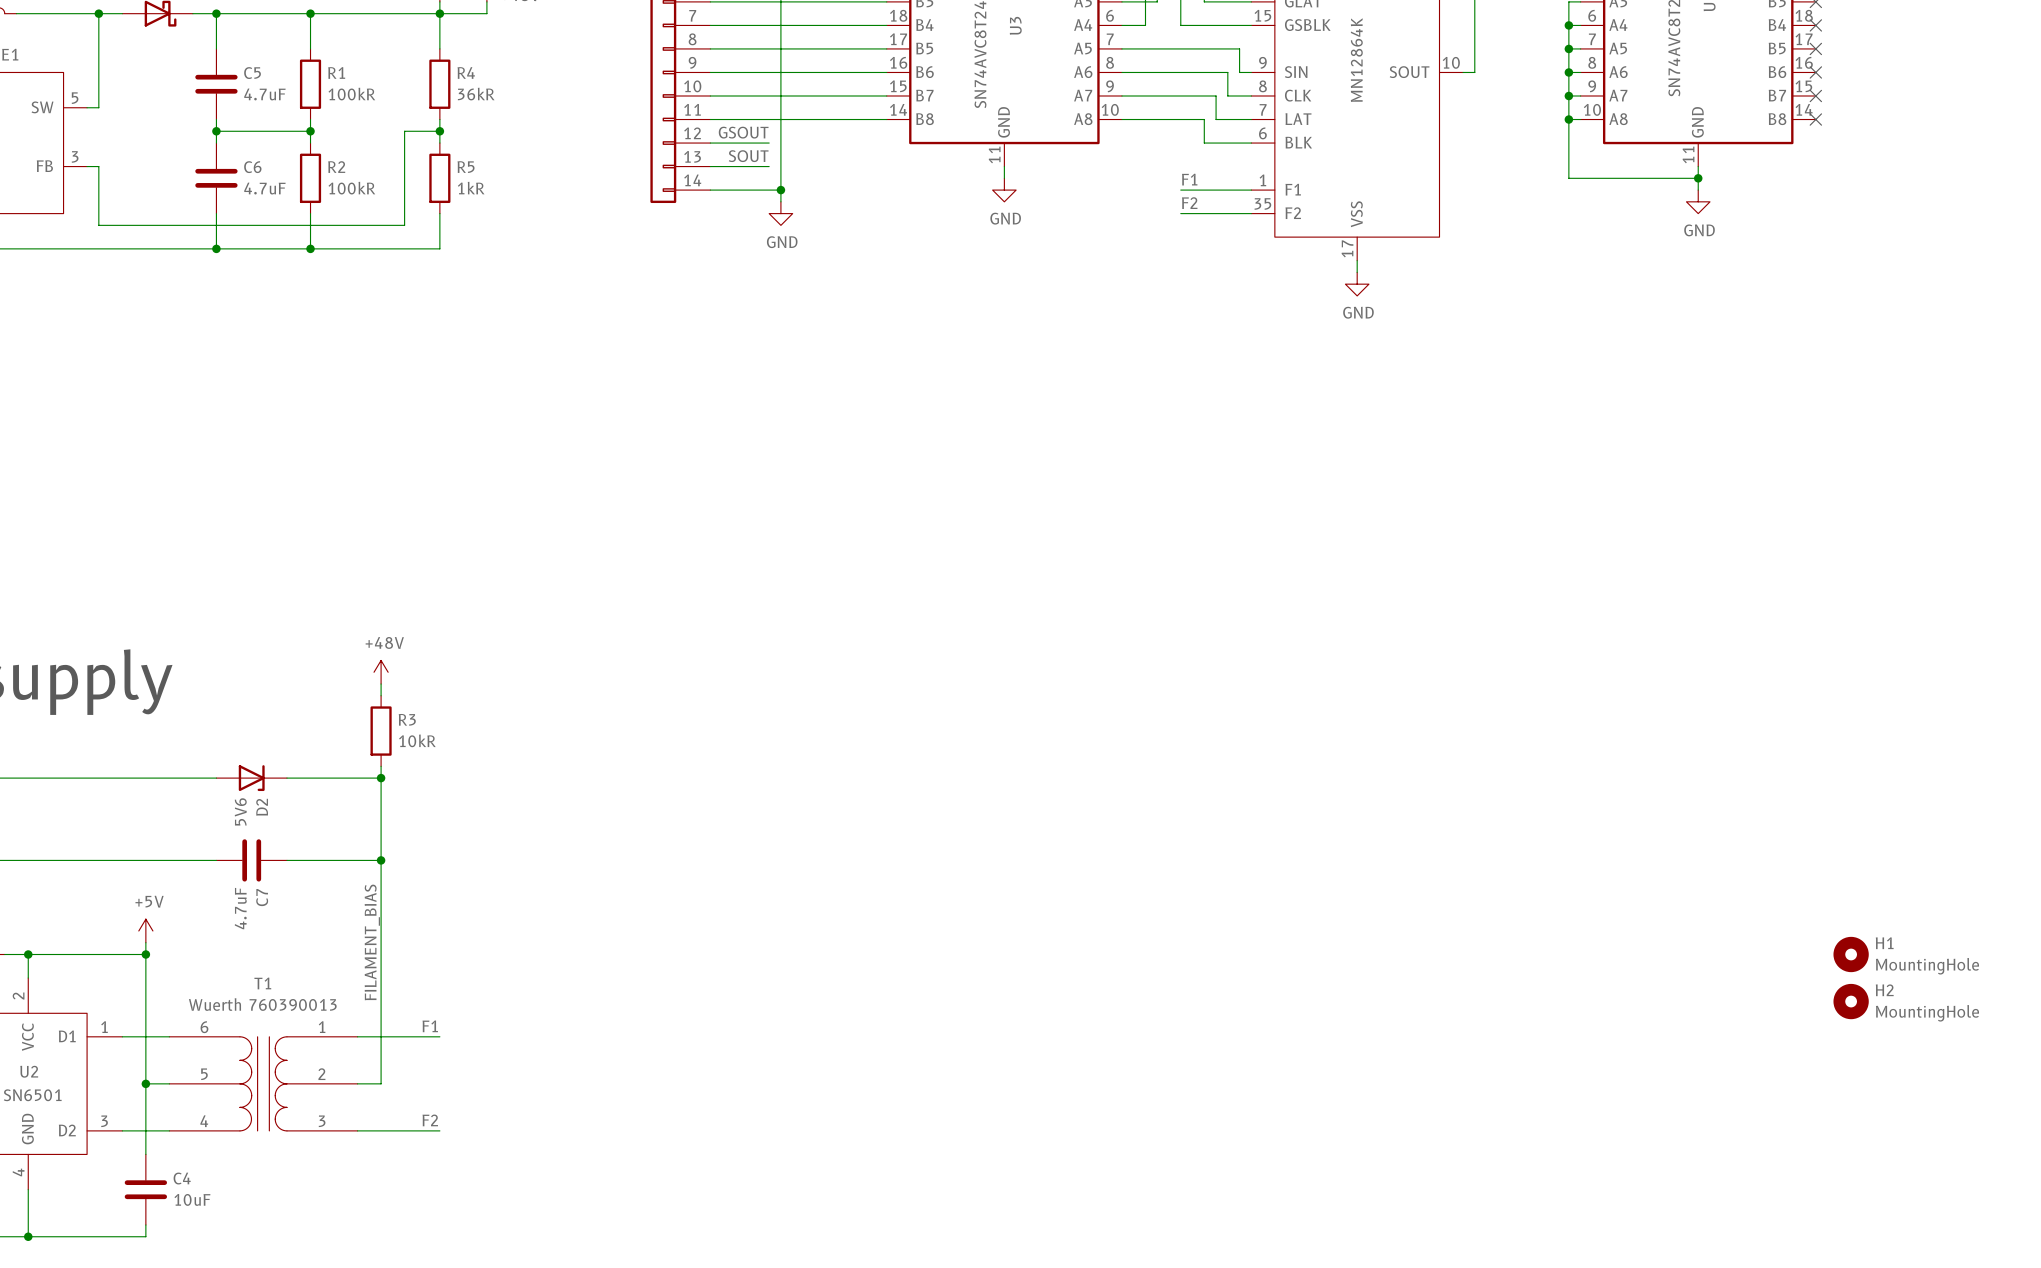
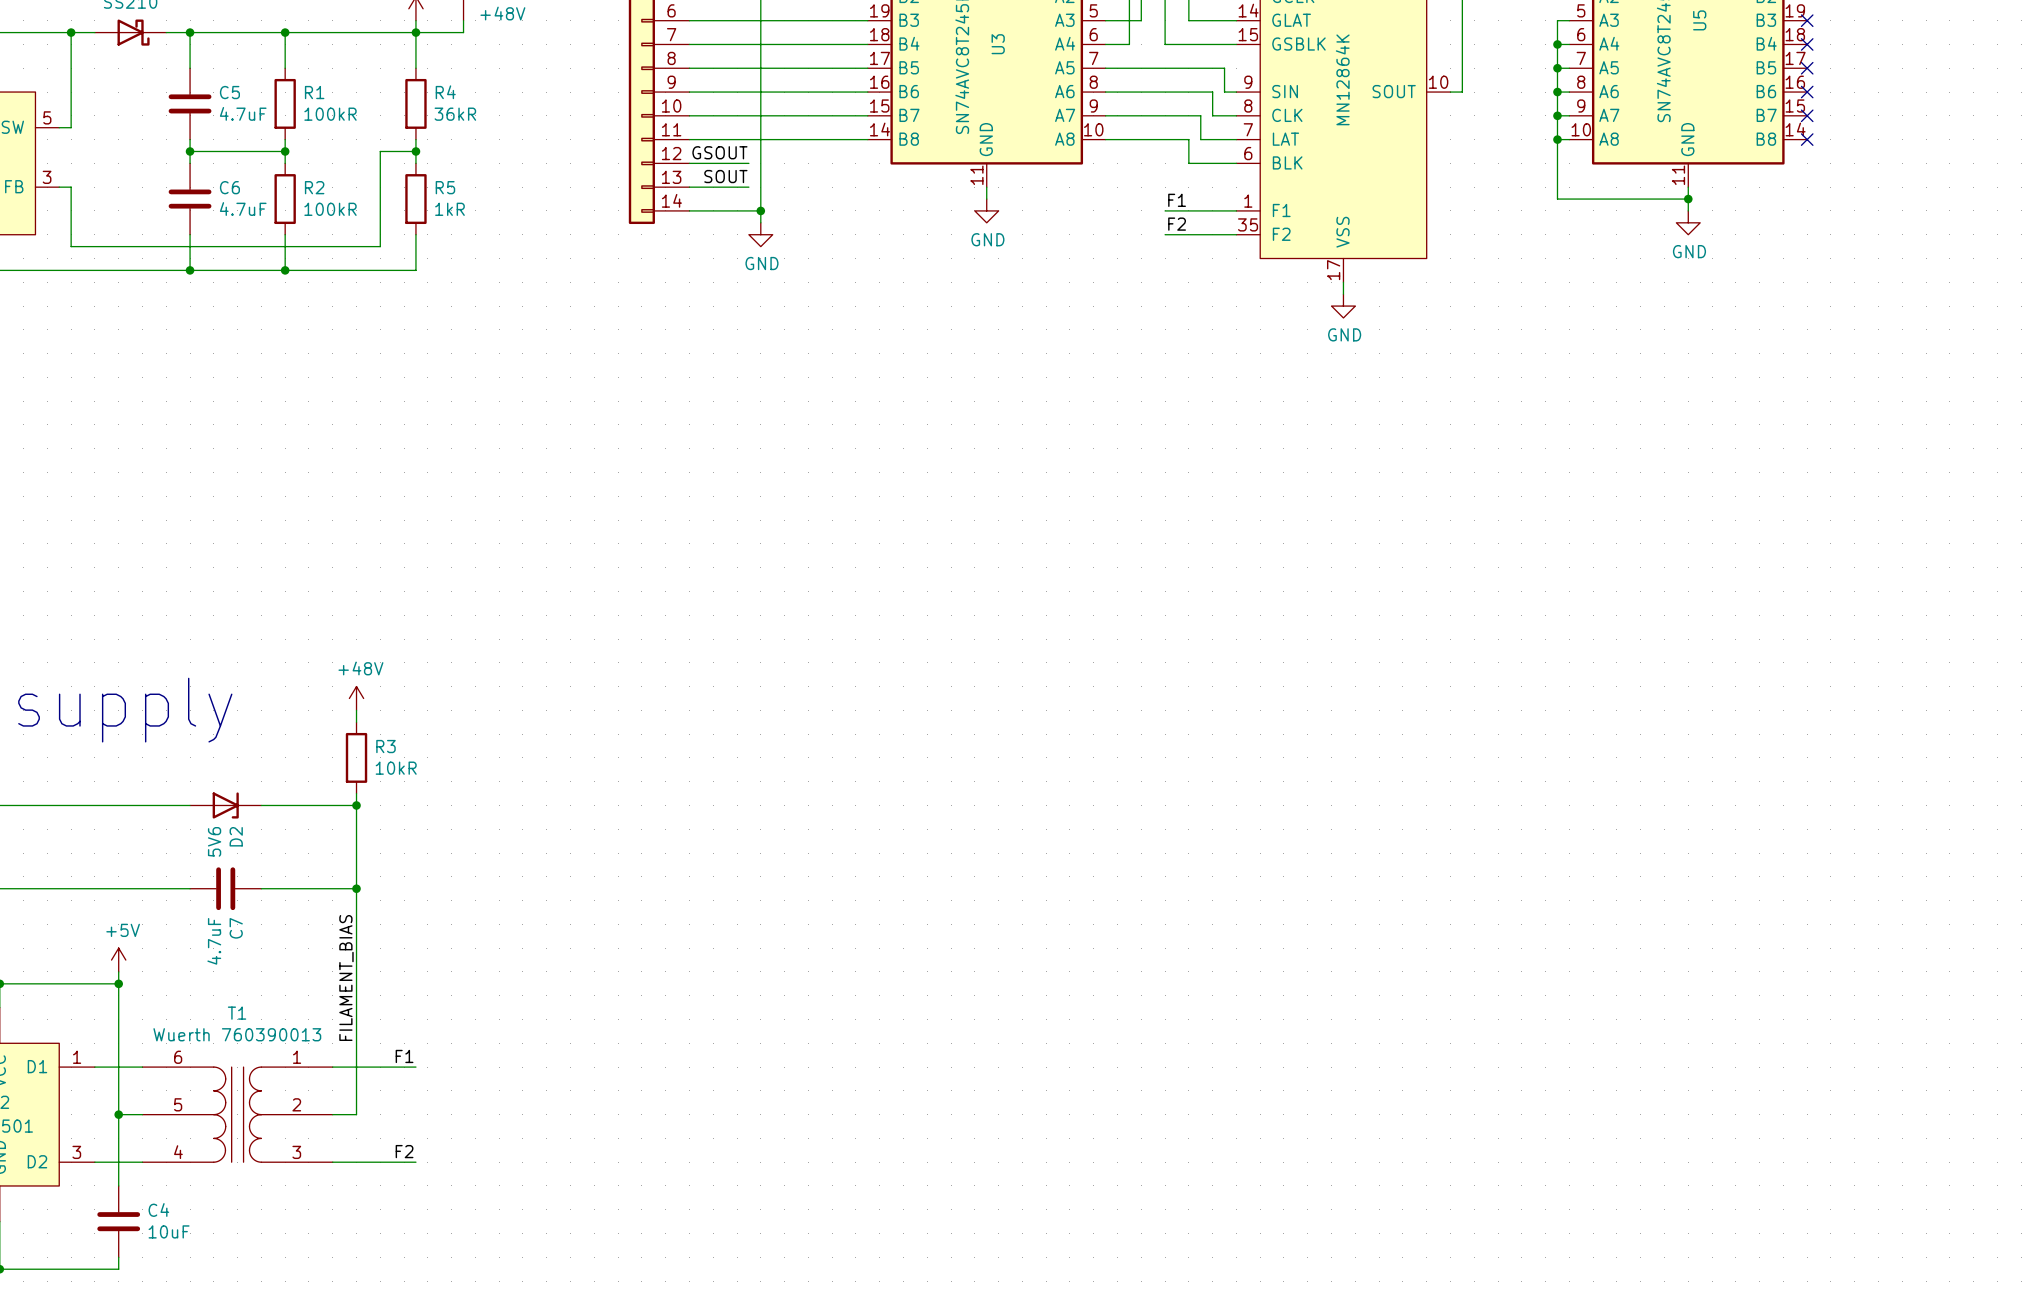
H1: MountingHole (1851, 954) -> none
H2: MountingHole (1851, 1001) -> none

